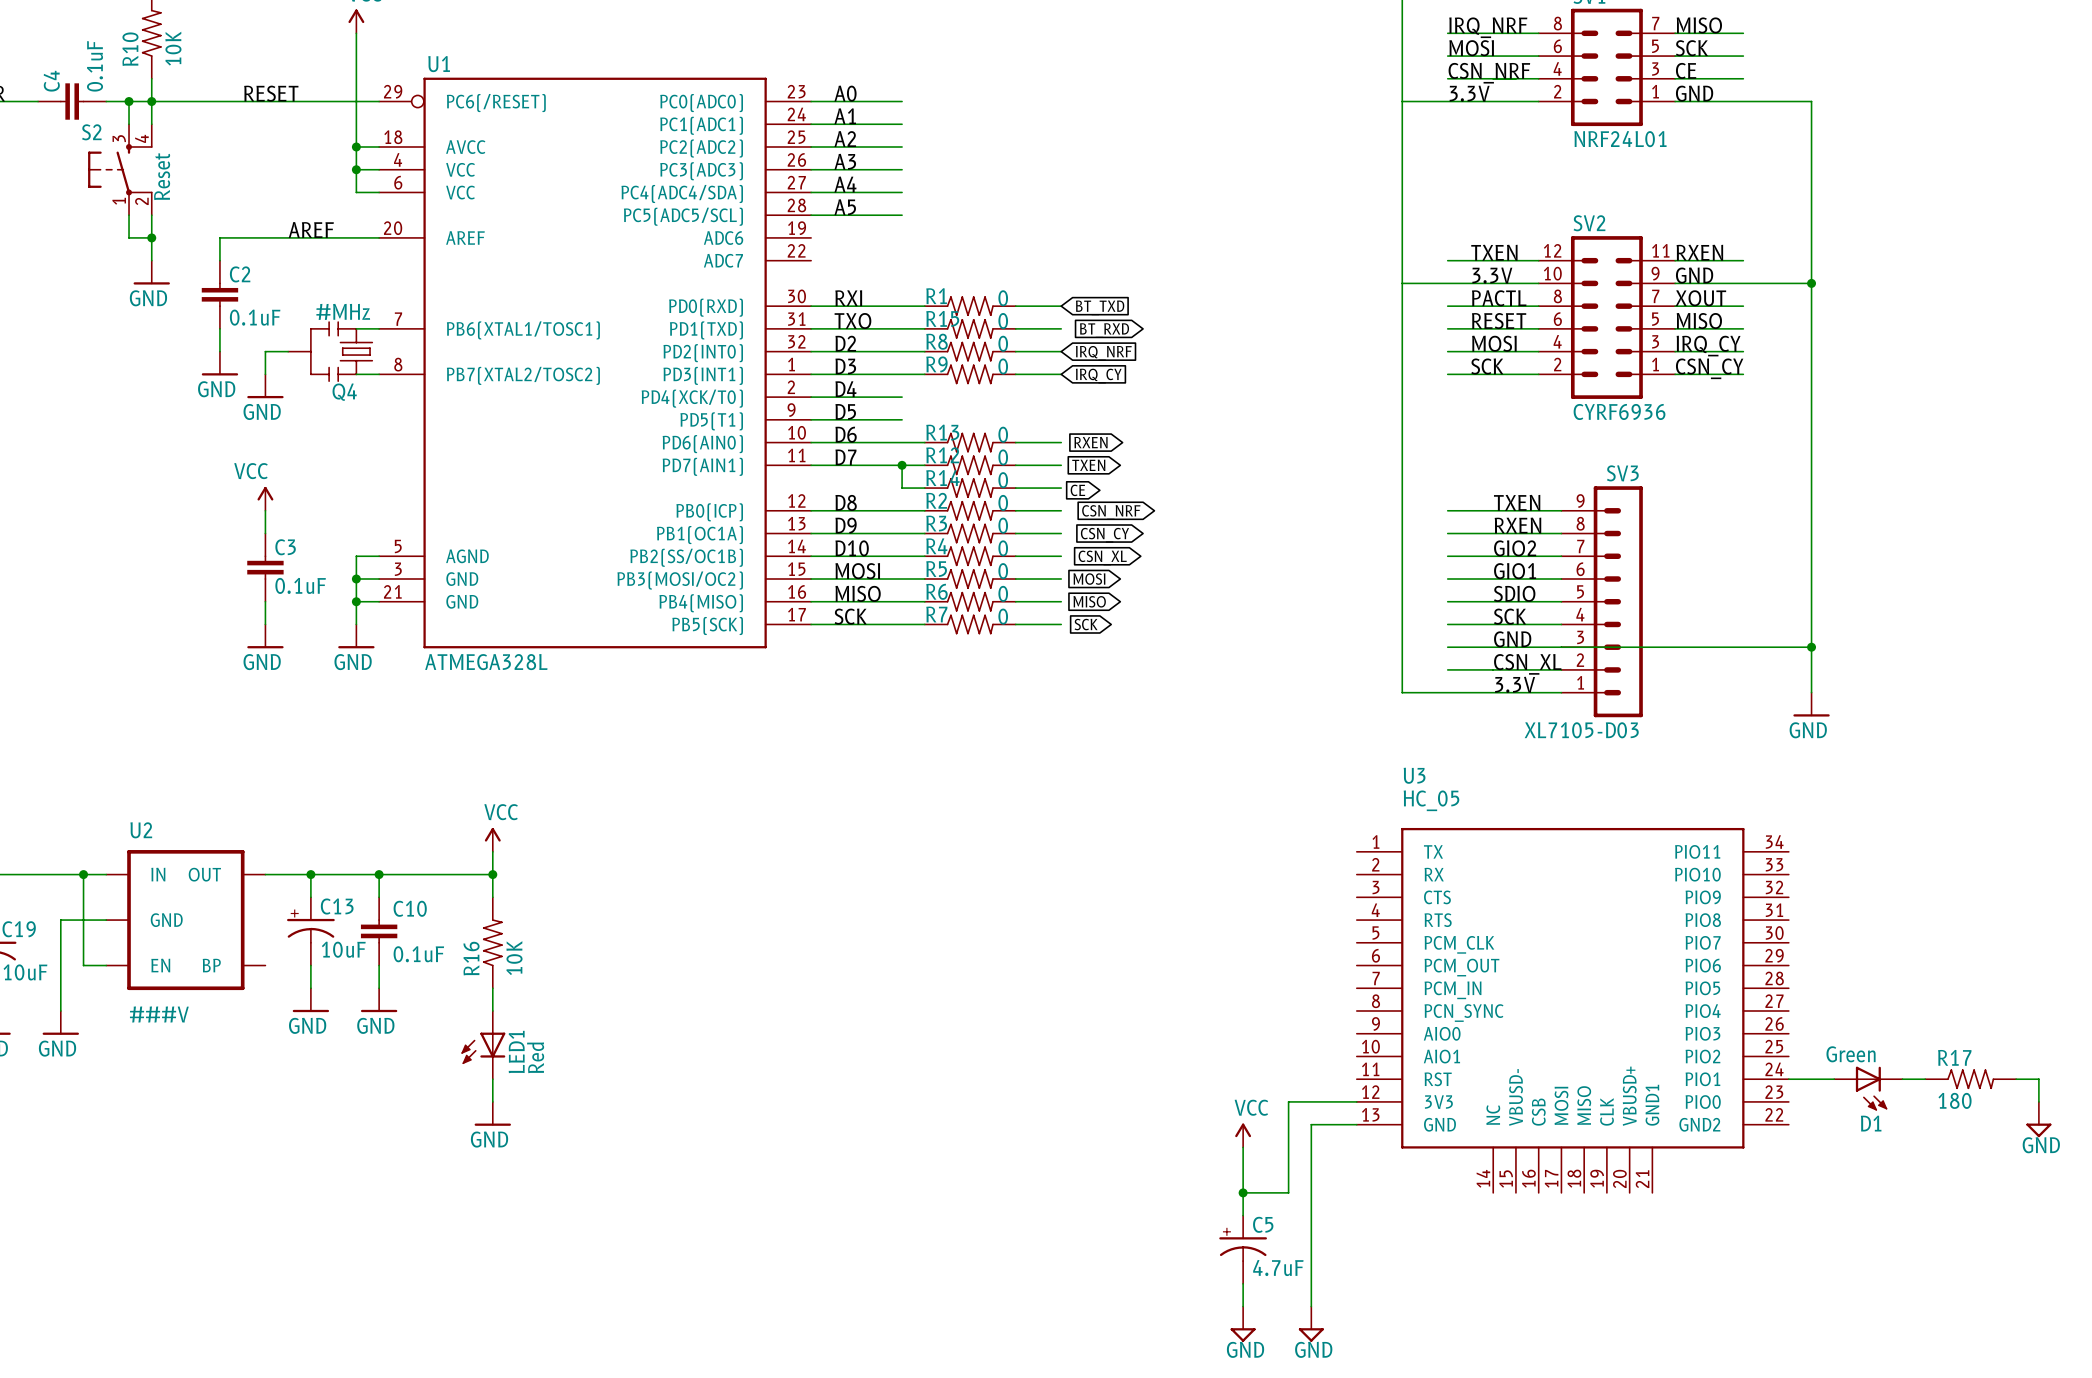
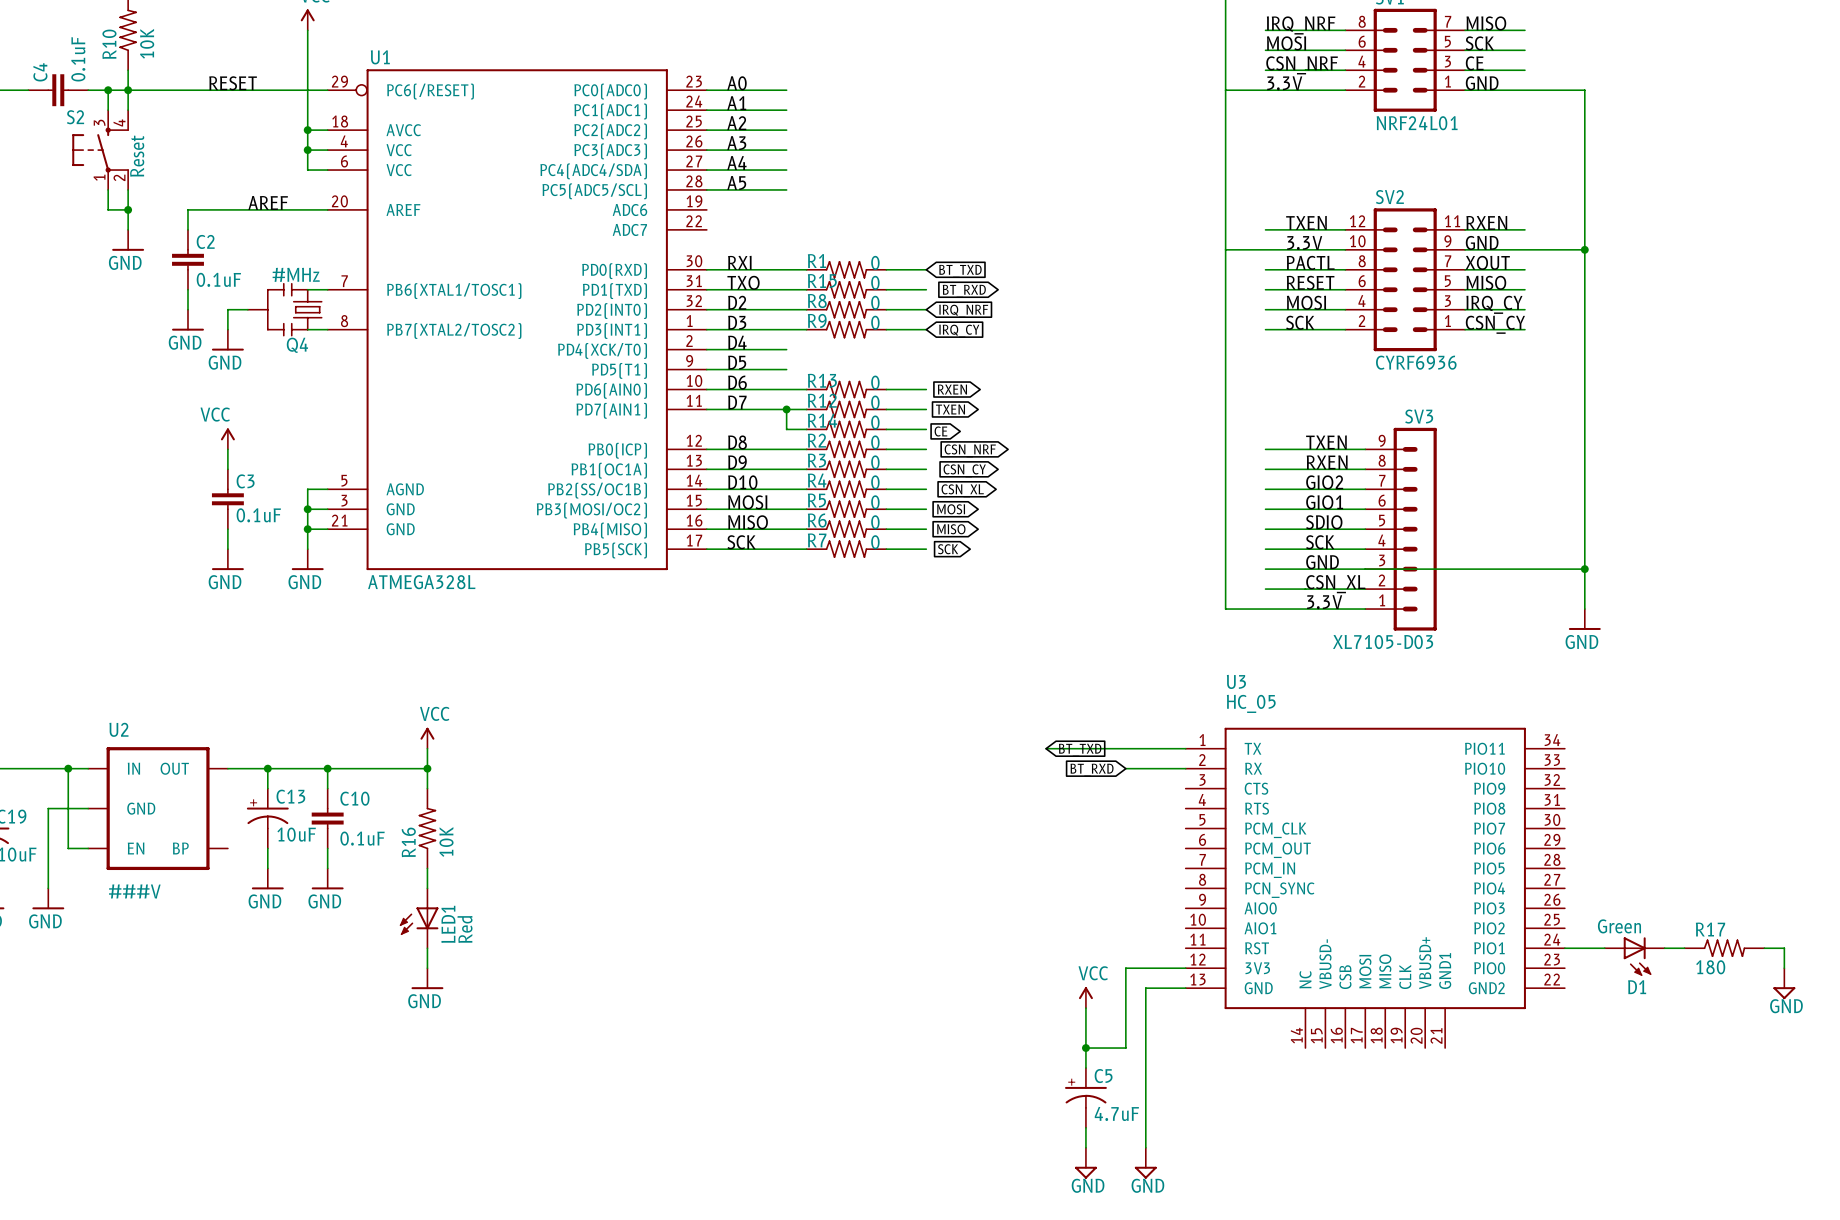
wire: none -> (1046, 748) (1185, 748)
global label: none -> BT_TXD (1080, 750)
wire: none -> (1125, 768) (1185, 768)
global label: none -> BT_RXD (1092, 770)

